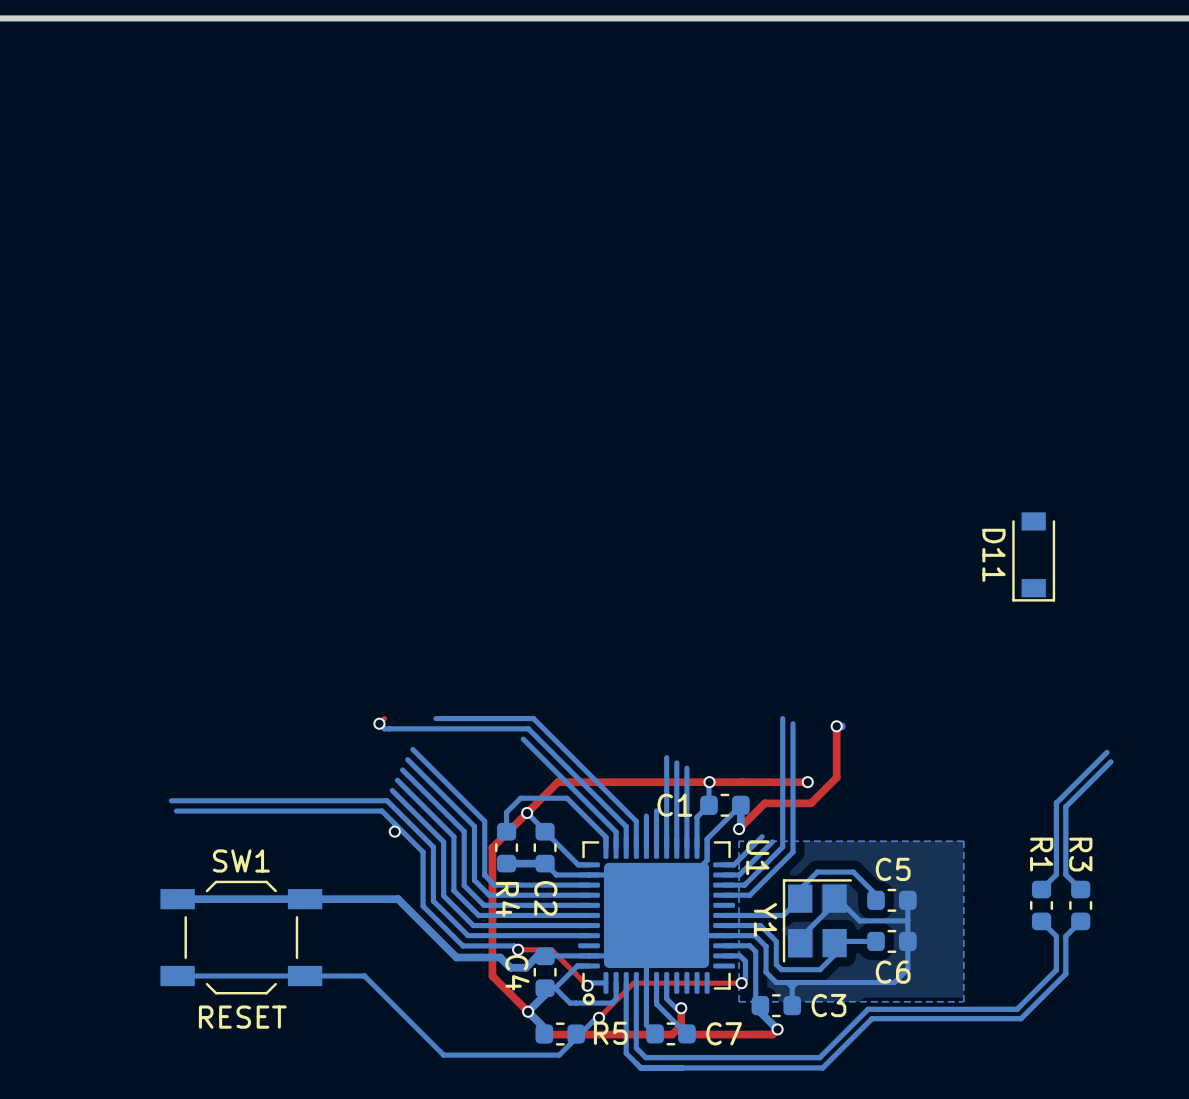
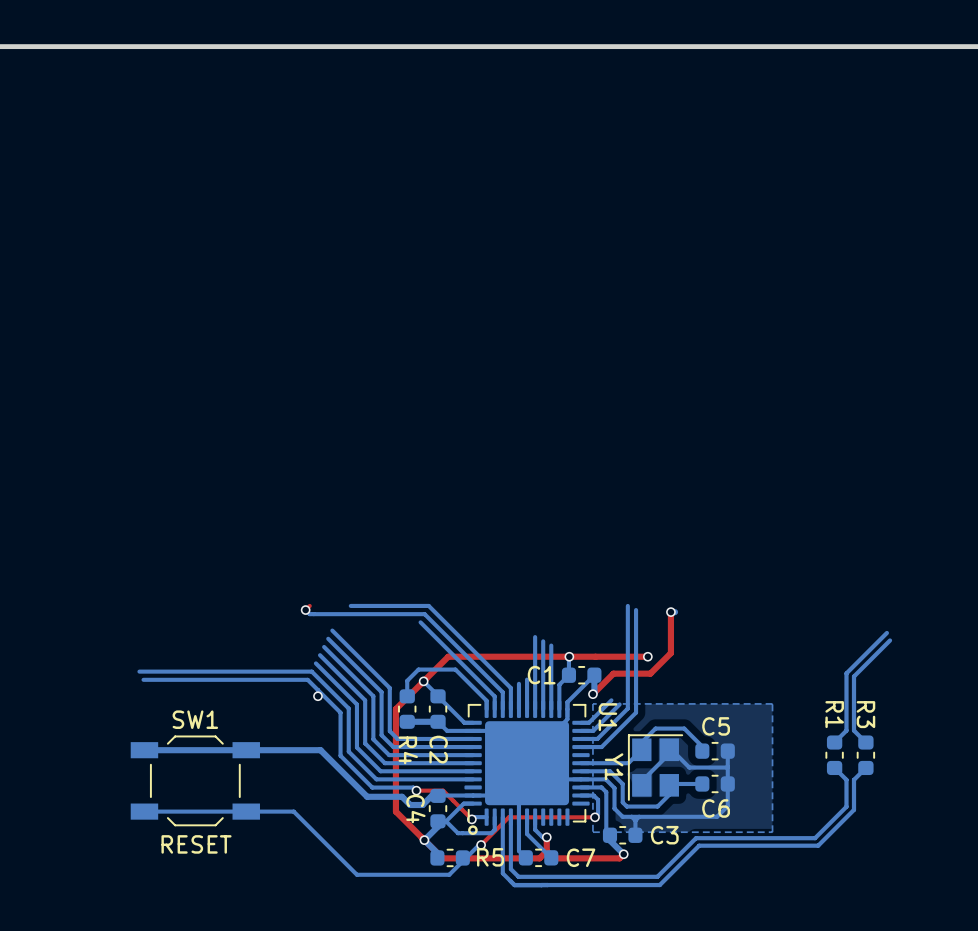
D11: (1033, 556) -> none

